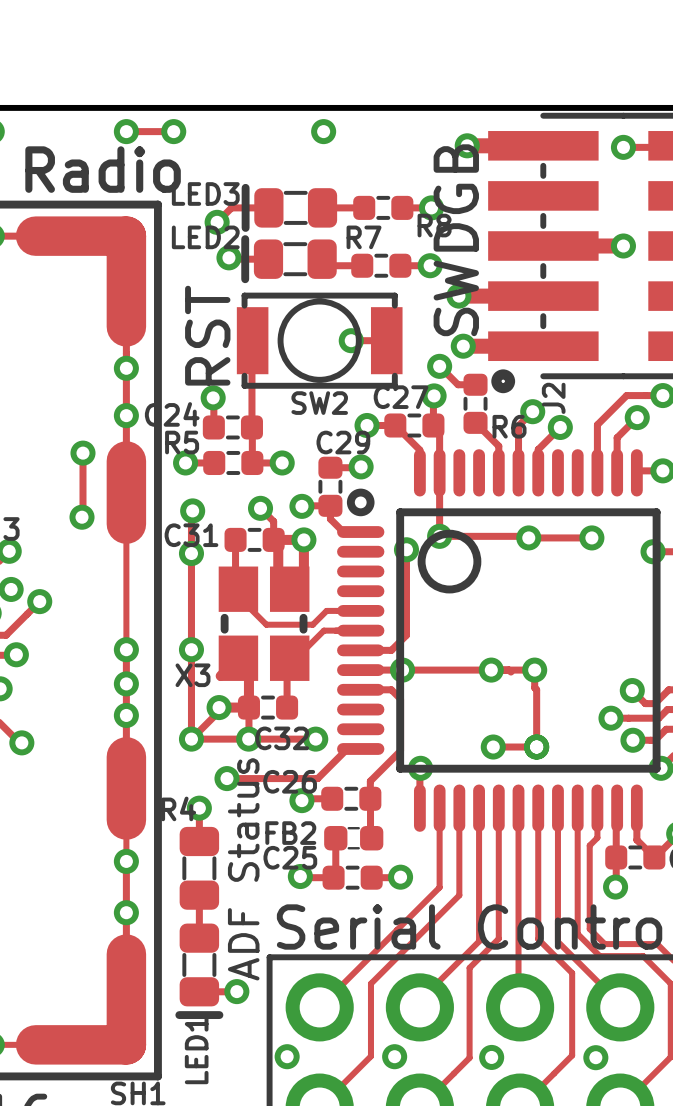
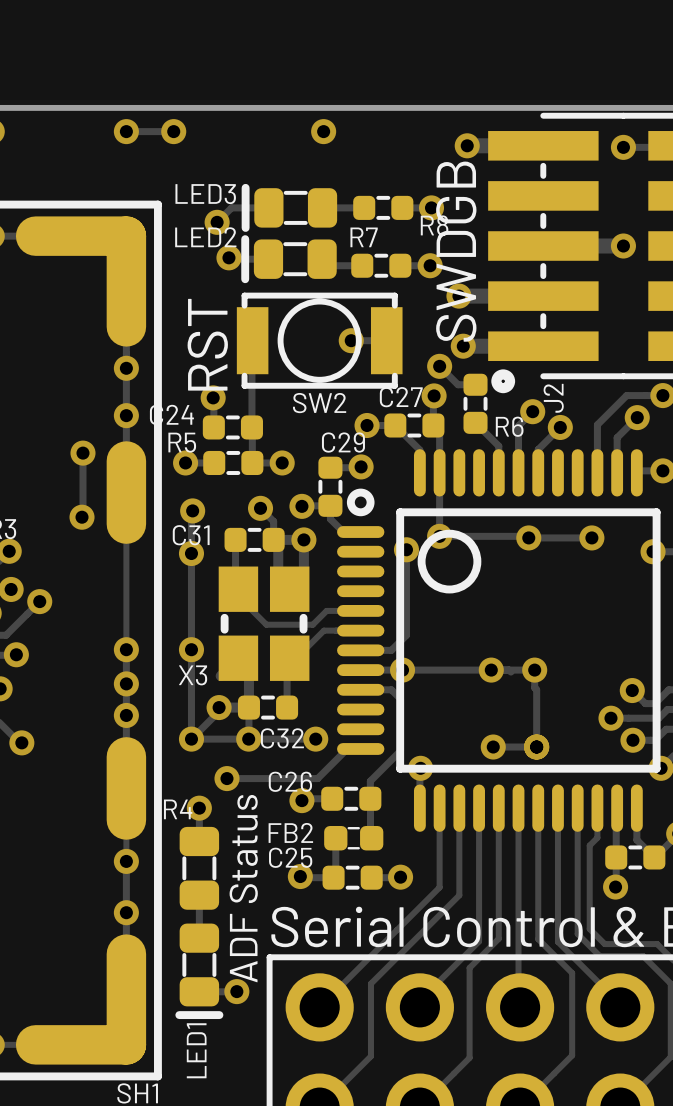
via: (287, 1056) -> none
via: (394, 1056) -> none
via: (491, 1057) -> none
via: (595, 1057) -> none

